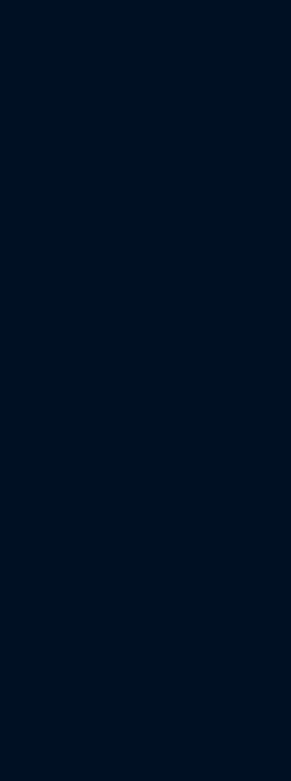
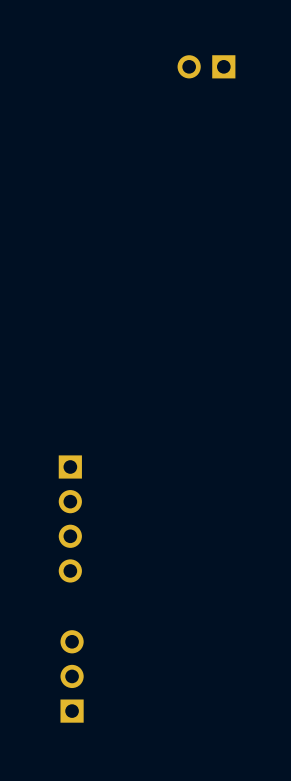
part: none -> (206, 66)
part: none -> (70, 518)
part: none -> (72, 676)

